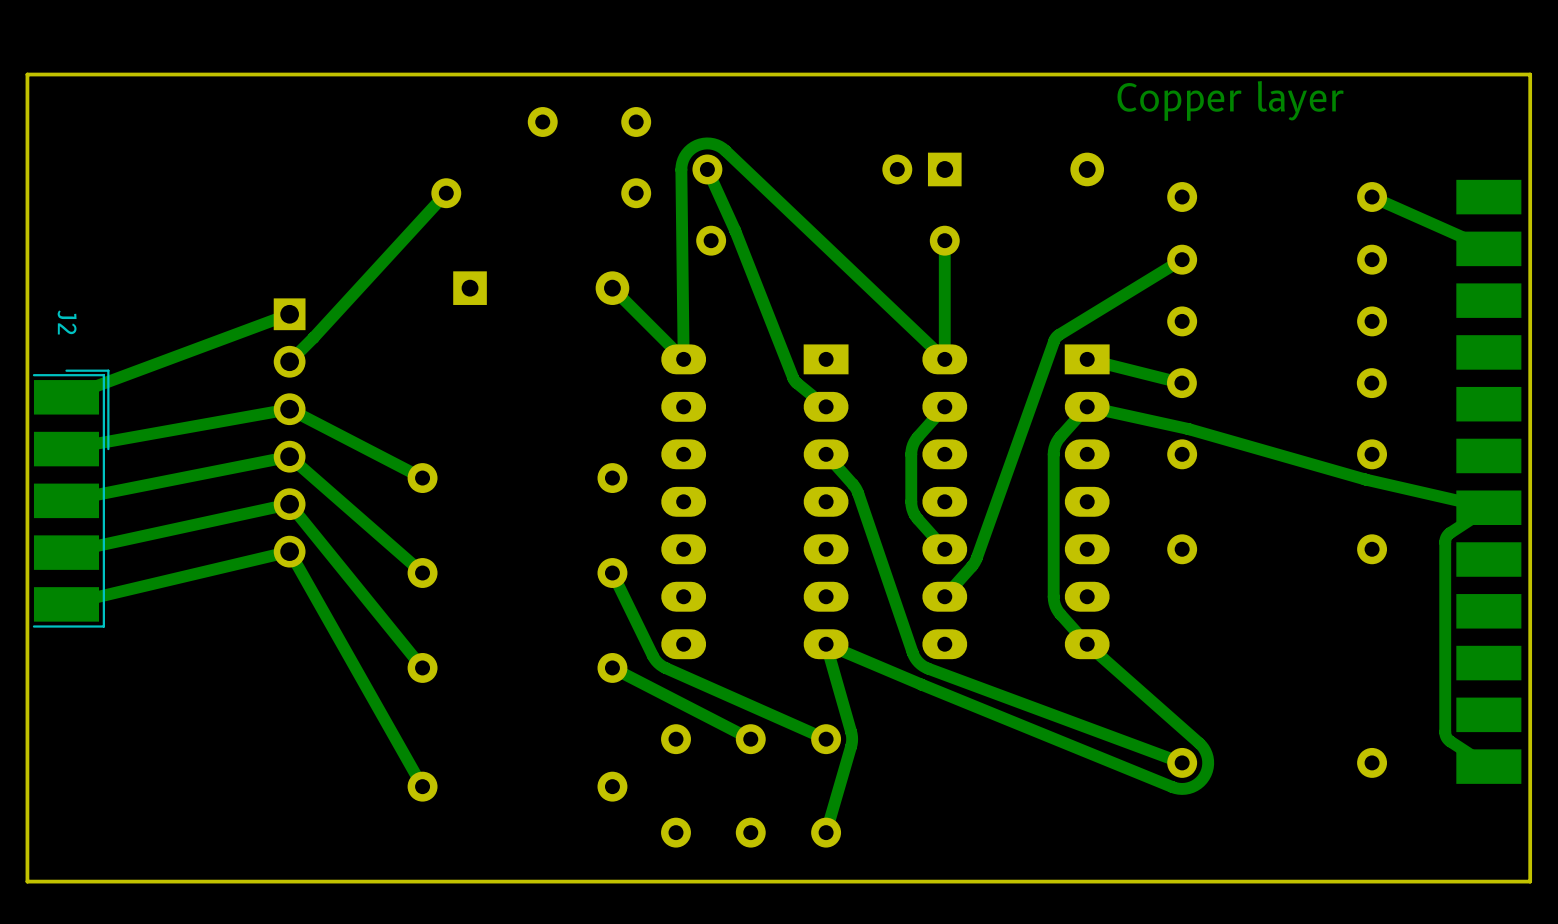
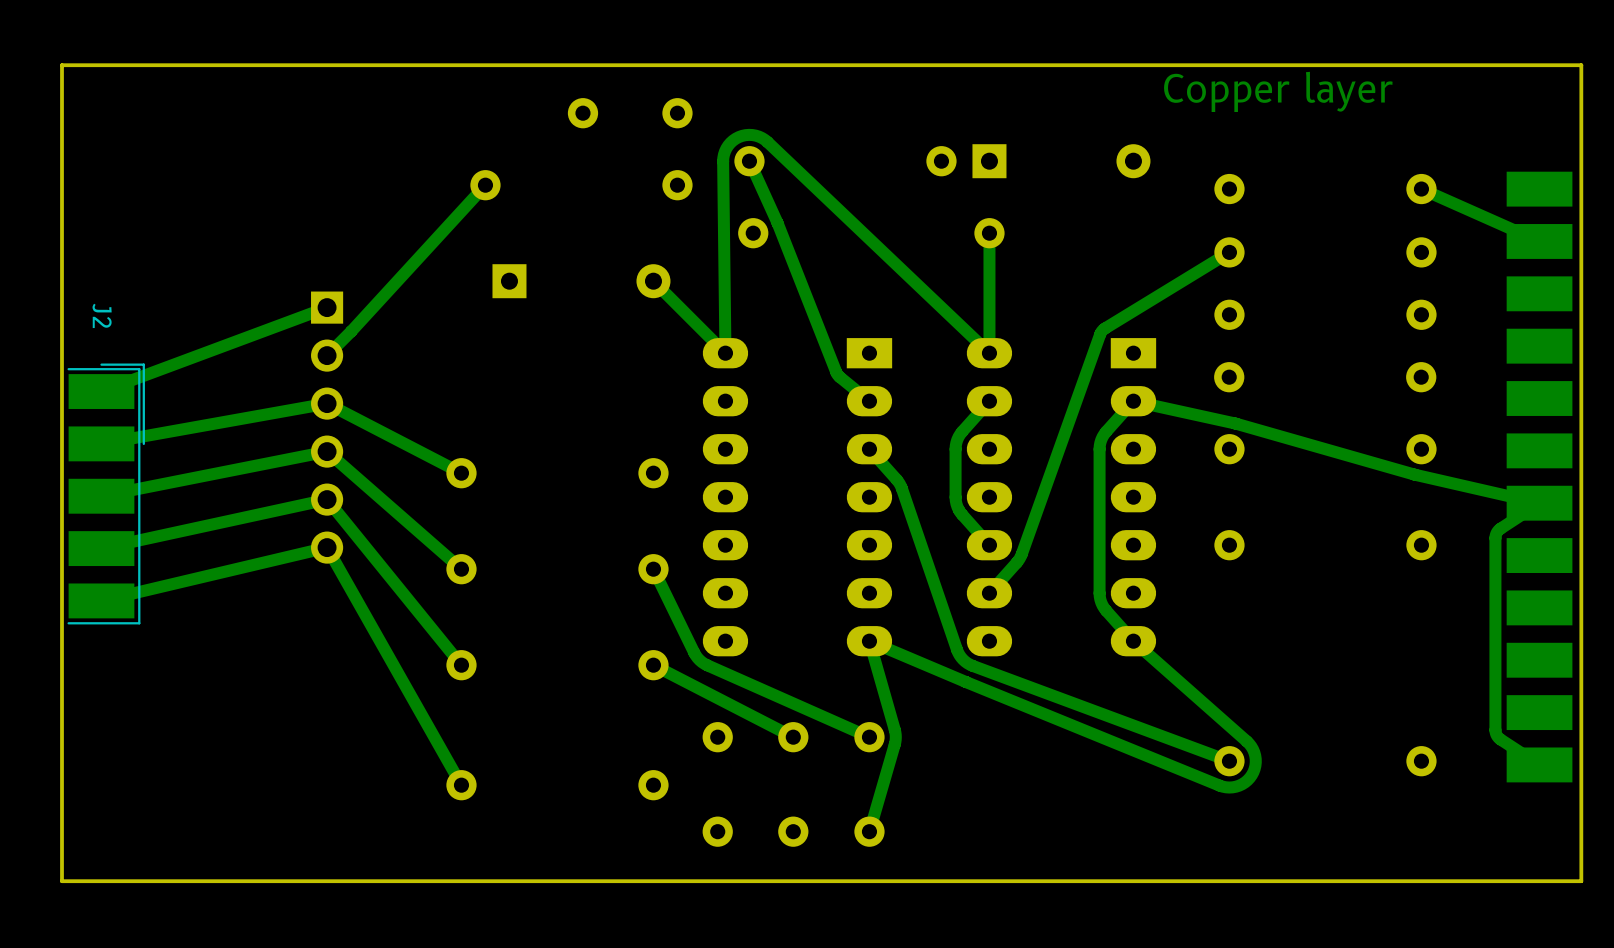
track: (1087, 359) (1181, 383) -> none

